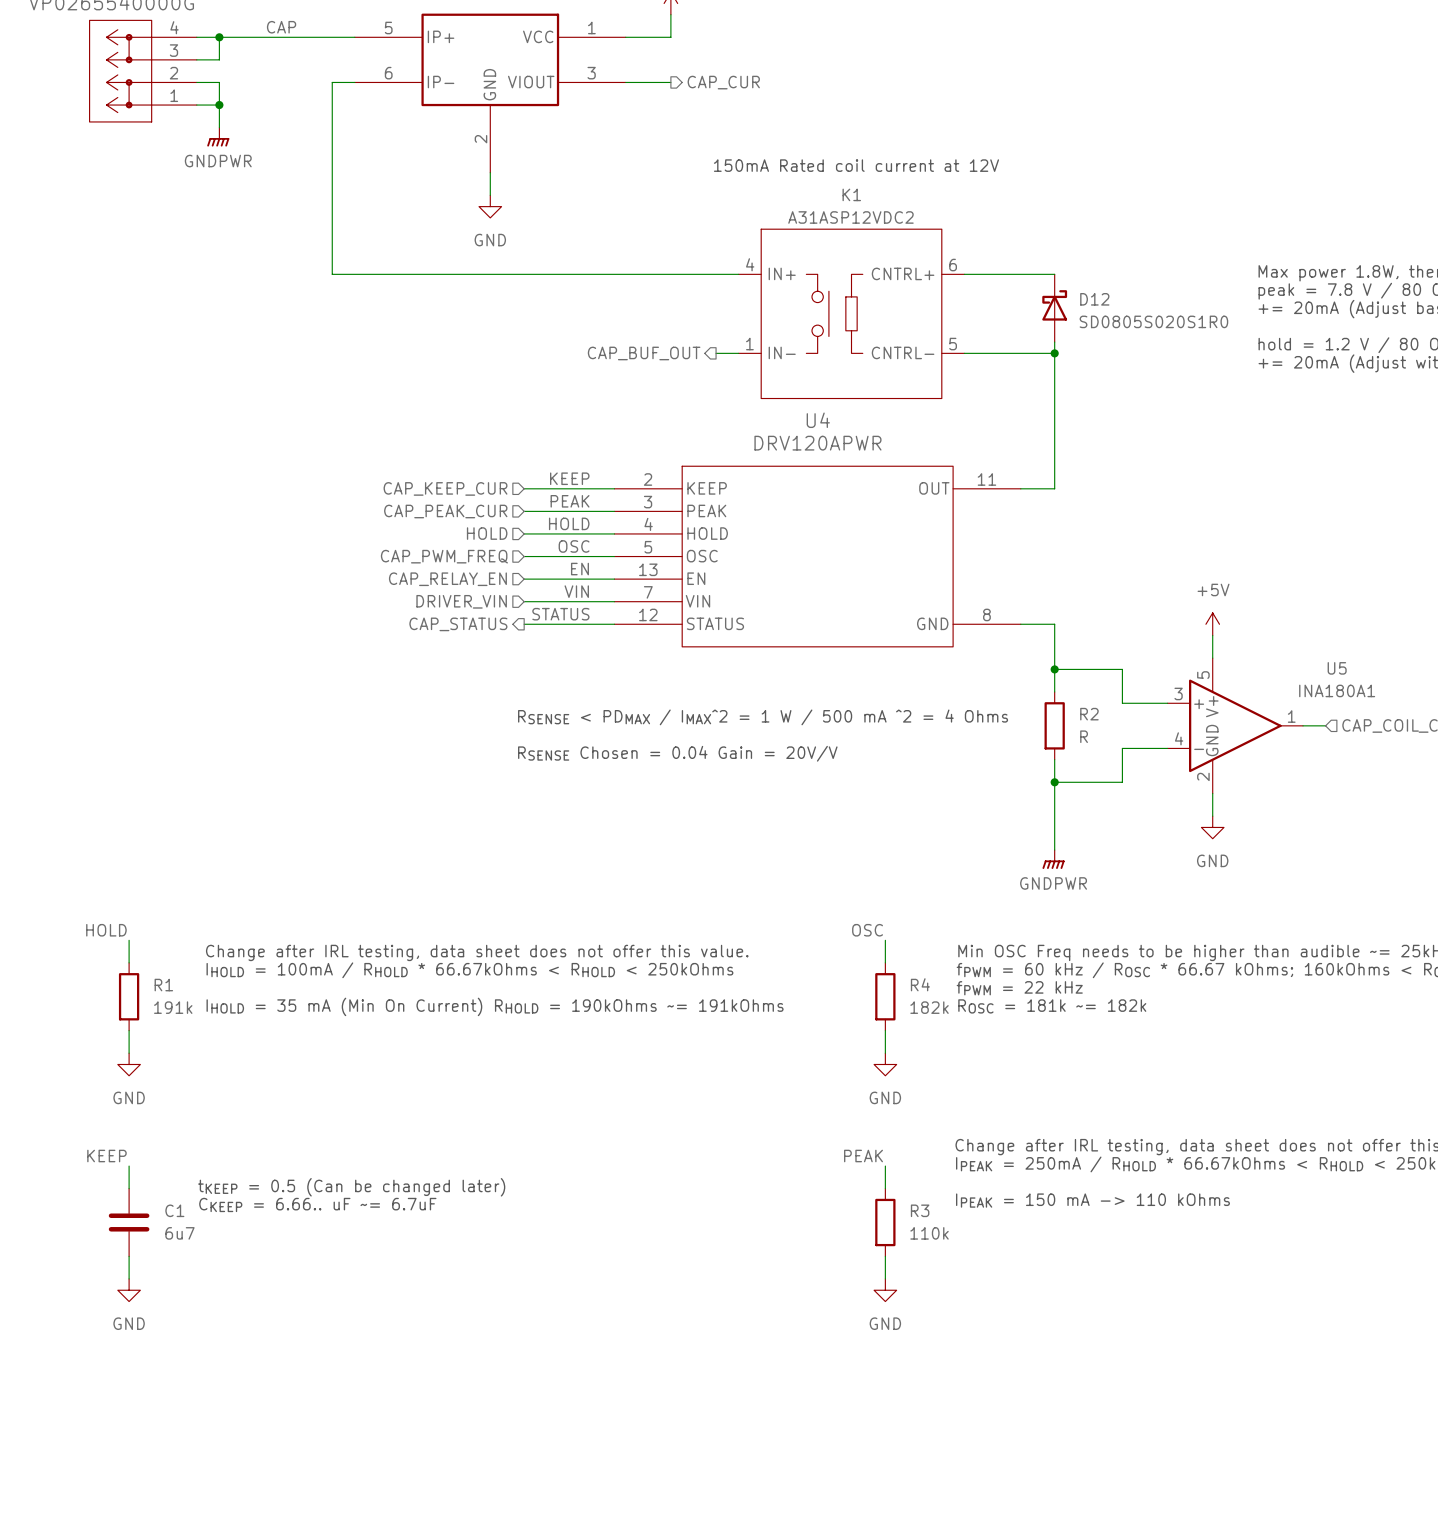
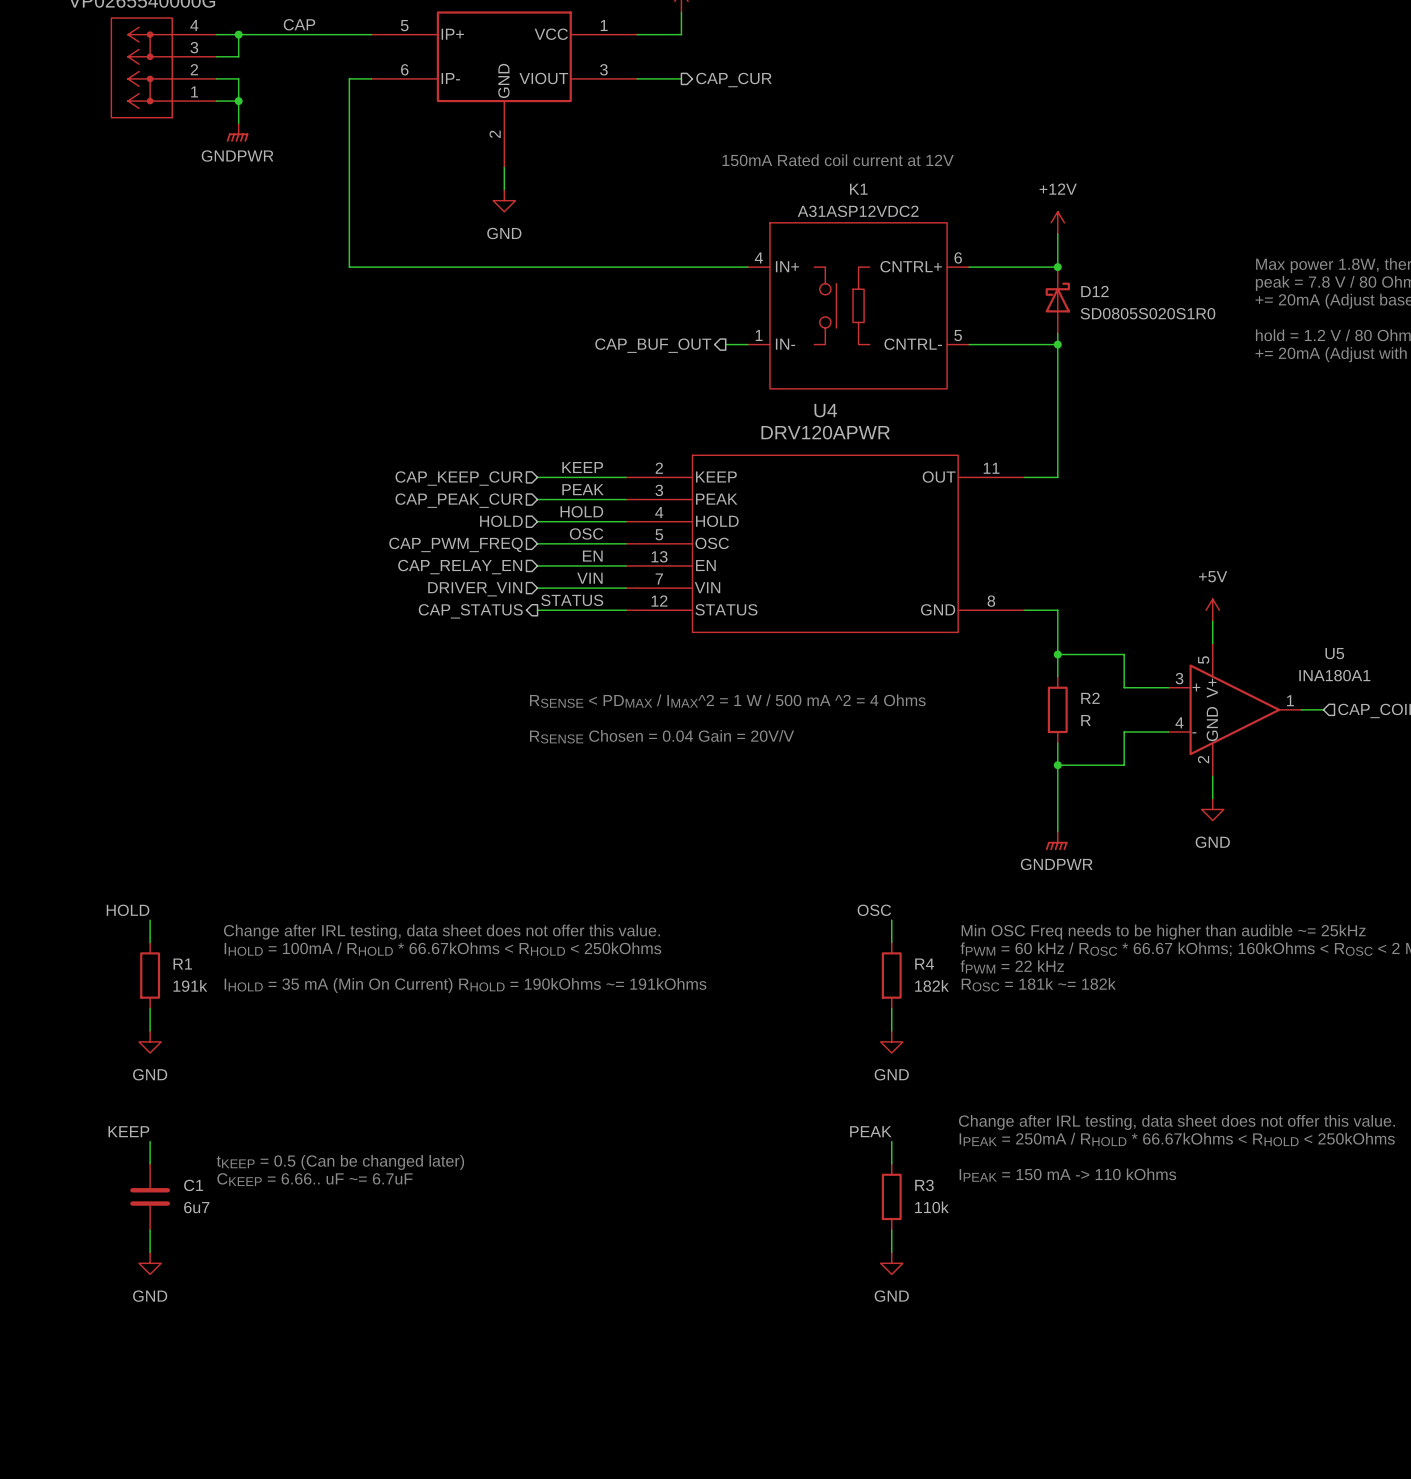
power symbol: none -> +12V (1057, 222)
wire: none -> (1057, 233) (1057, 267)
junction: none -> (1057, 267)

